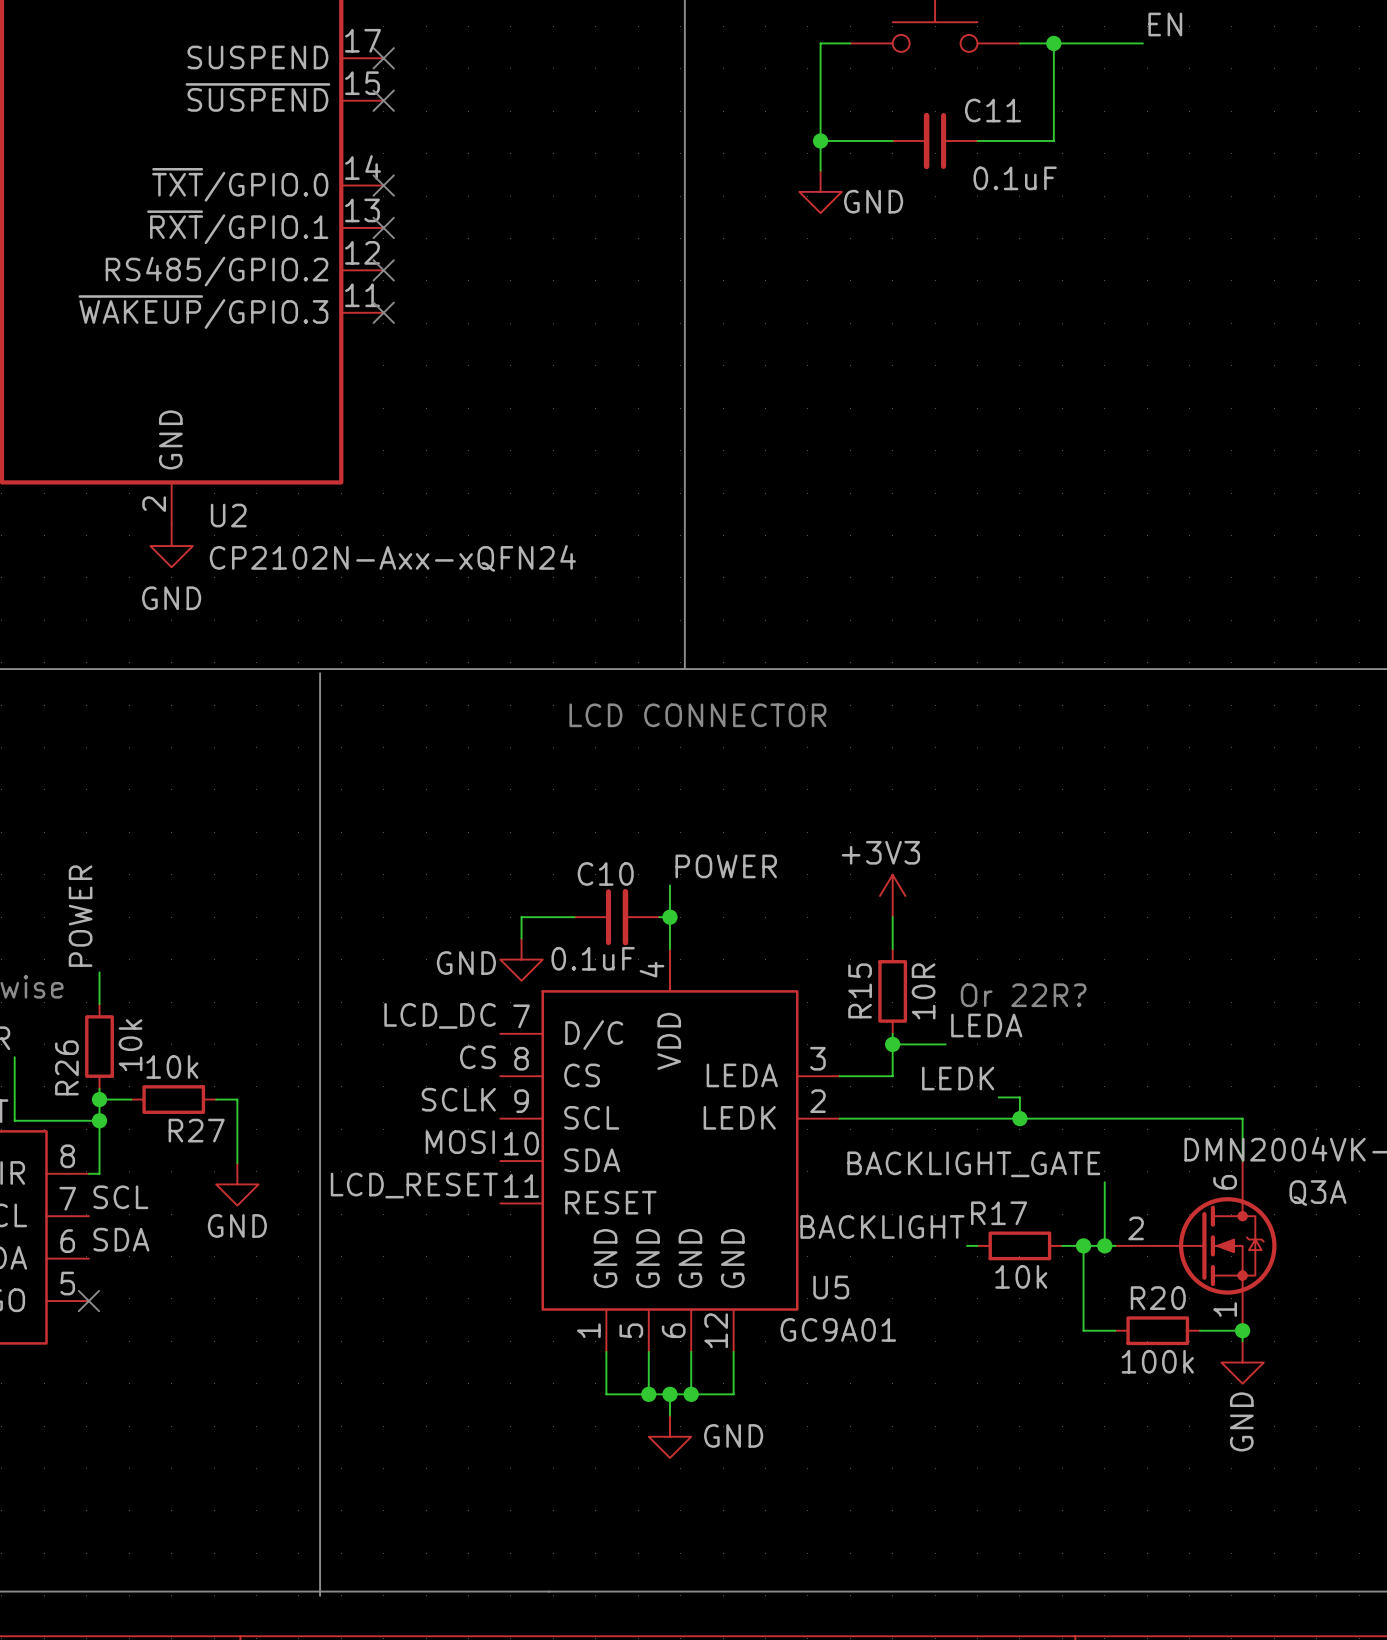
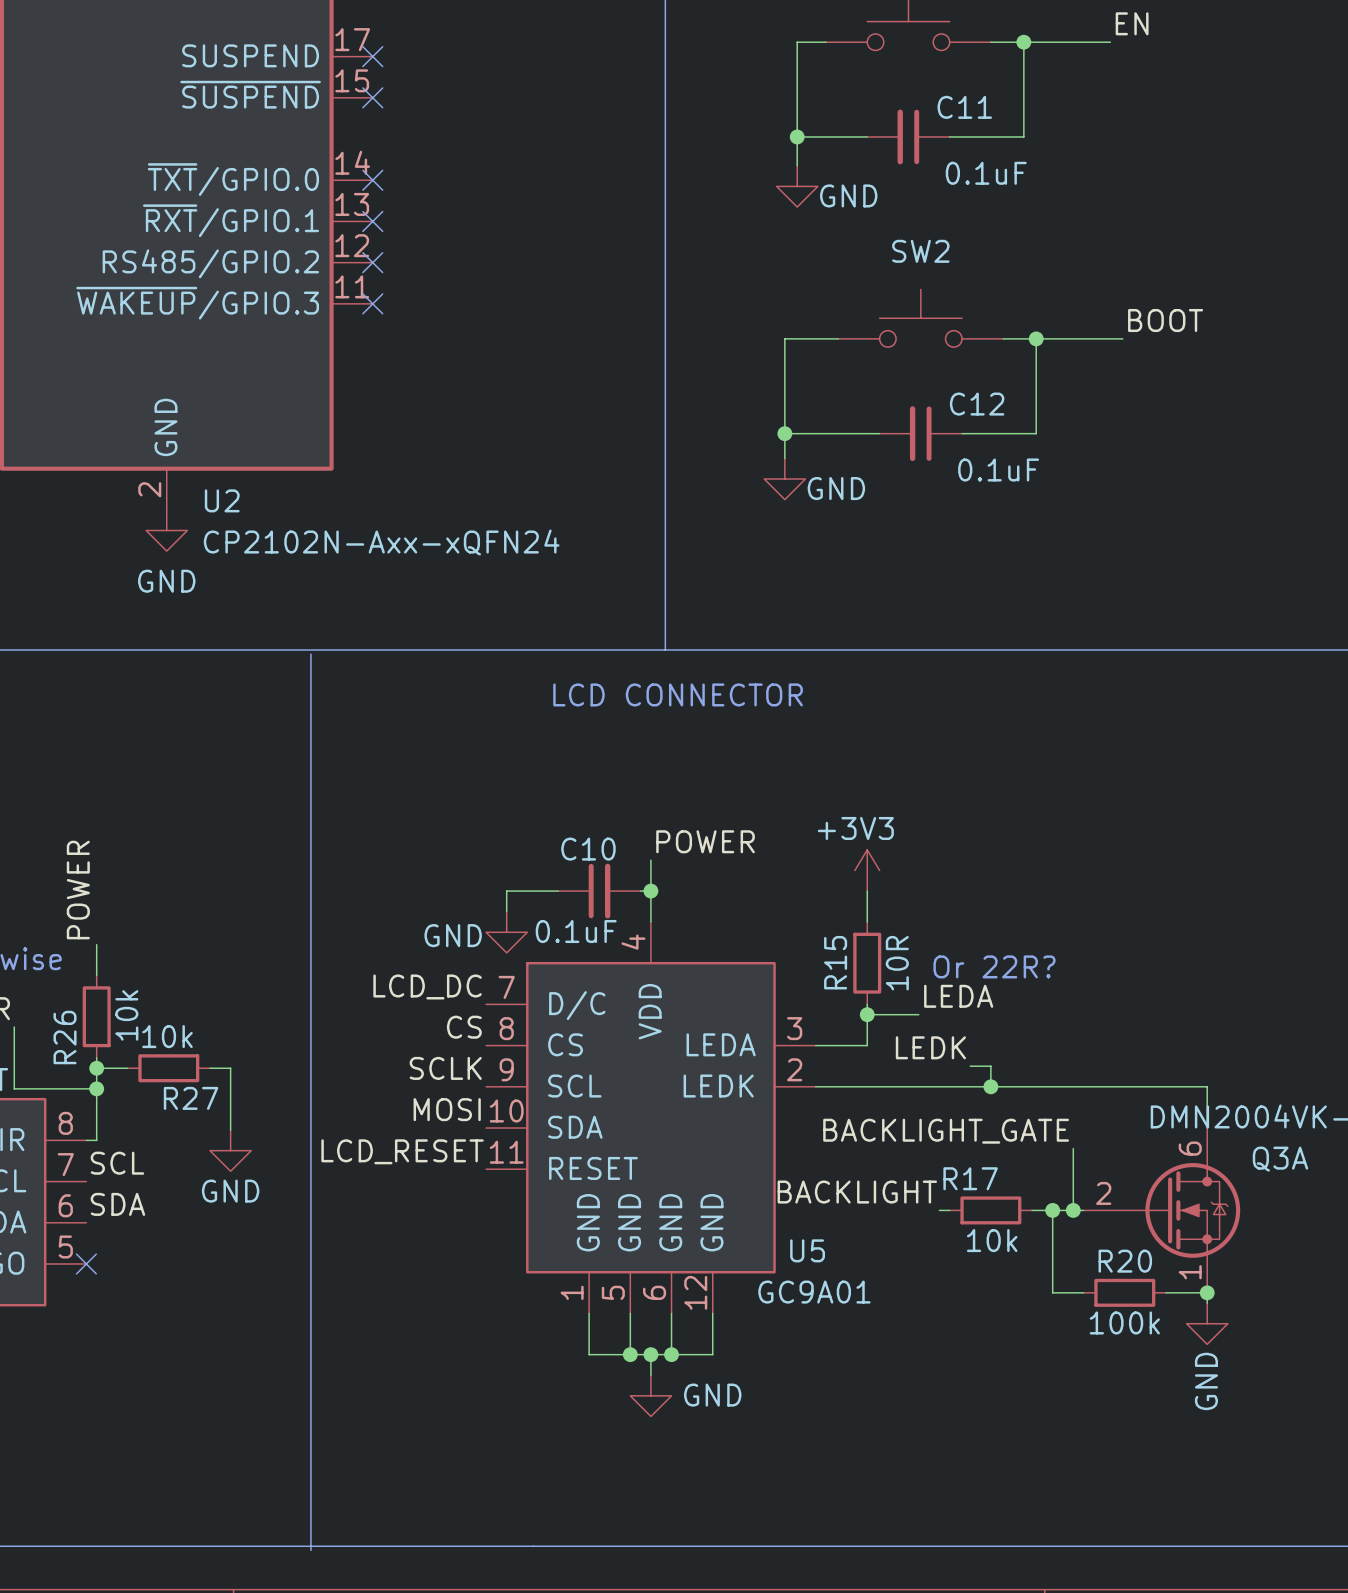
SW2: none -> (920, 318)
label: none -> BOOT (1165, 320)
wire: none -> (838, 338) (784, 338) (784, 458)
wire: none -> (1003, 338) (1122, 338)
wire: none -> (1036, 338) (1036, 433) (962, 433)
junction: none -> (1036, 338)
wire: none -> (784, 433) (879, 433)
junction: none -> (784, 433)
C12: none -> 0.1uF (920, 433)
power symbol: none -> GND (784, 478)

